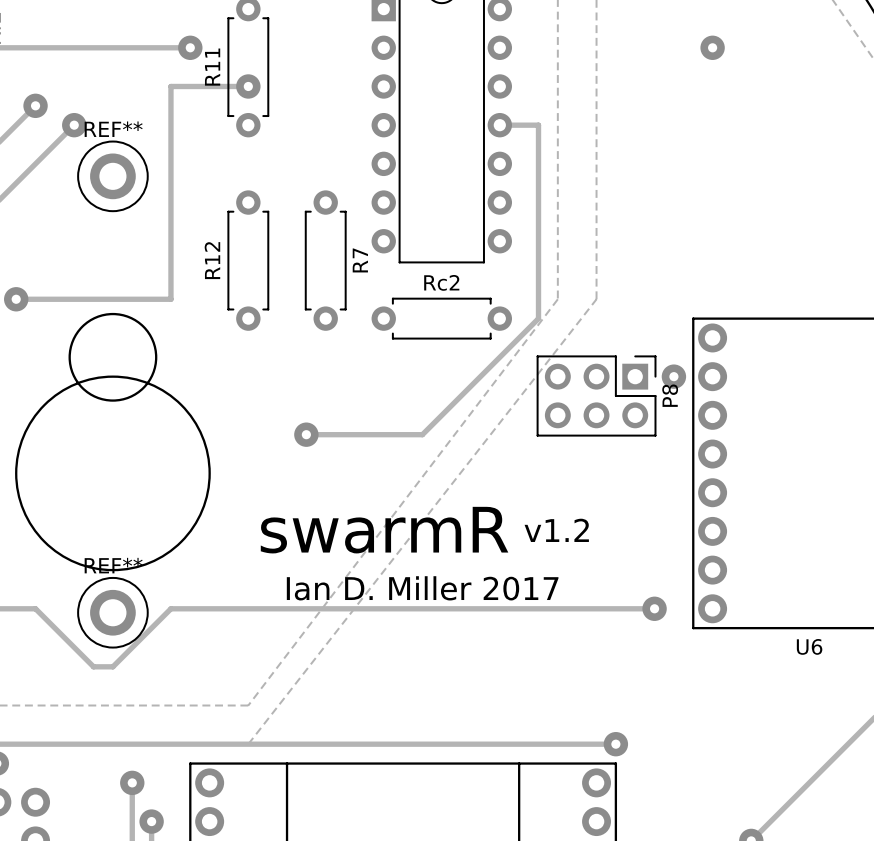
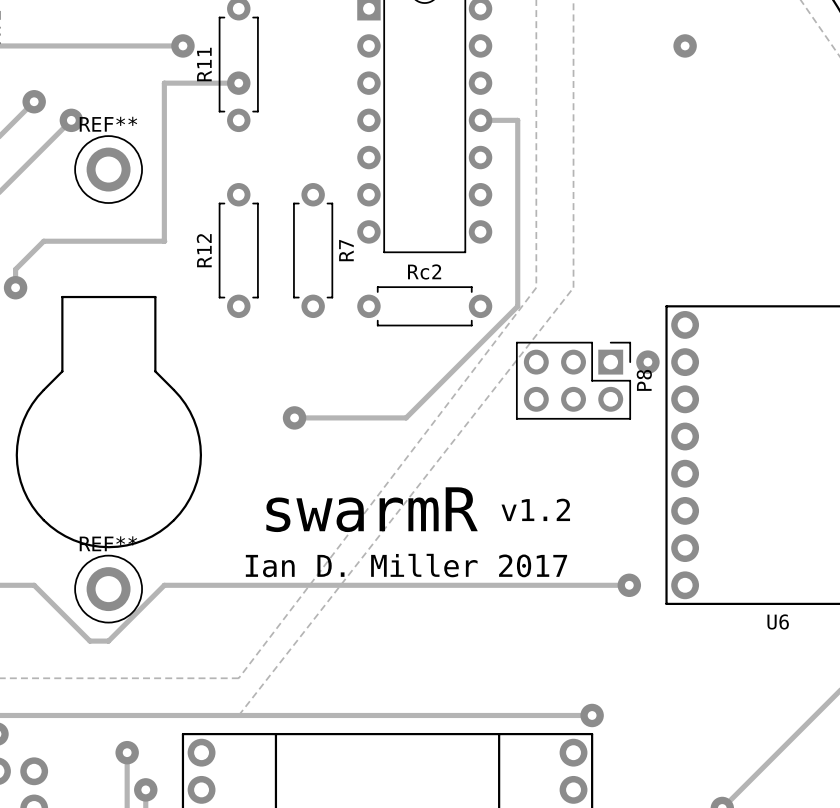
track: (170, 250) (170, 299) (16, 299) -> (164, 241) (43, 241) (15, 269) (15, 287)
round board edge: [68, 312, 158, 402] -> none
round board edge: [15, 375, 211, 572] -> none
board edge: none -> (43, 520) (32, 506) (23, 490) (18, 473) (17, 446) (23, 419) (32, 403) (62, 371) (62, 297) (155, 297) (155, 371) (185, 403) (193, 419) (200, 446) (199, 473) (193, 490) (185, 506) (173, 520)
board edge: none -> (173, 520) (160, 531) (144, 540) (126, 545) (108, 547) (90, 545) (73, 540) (57, 531) (43, 520)

